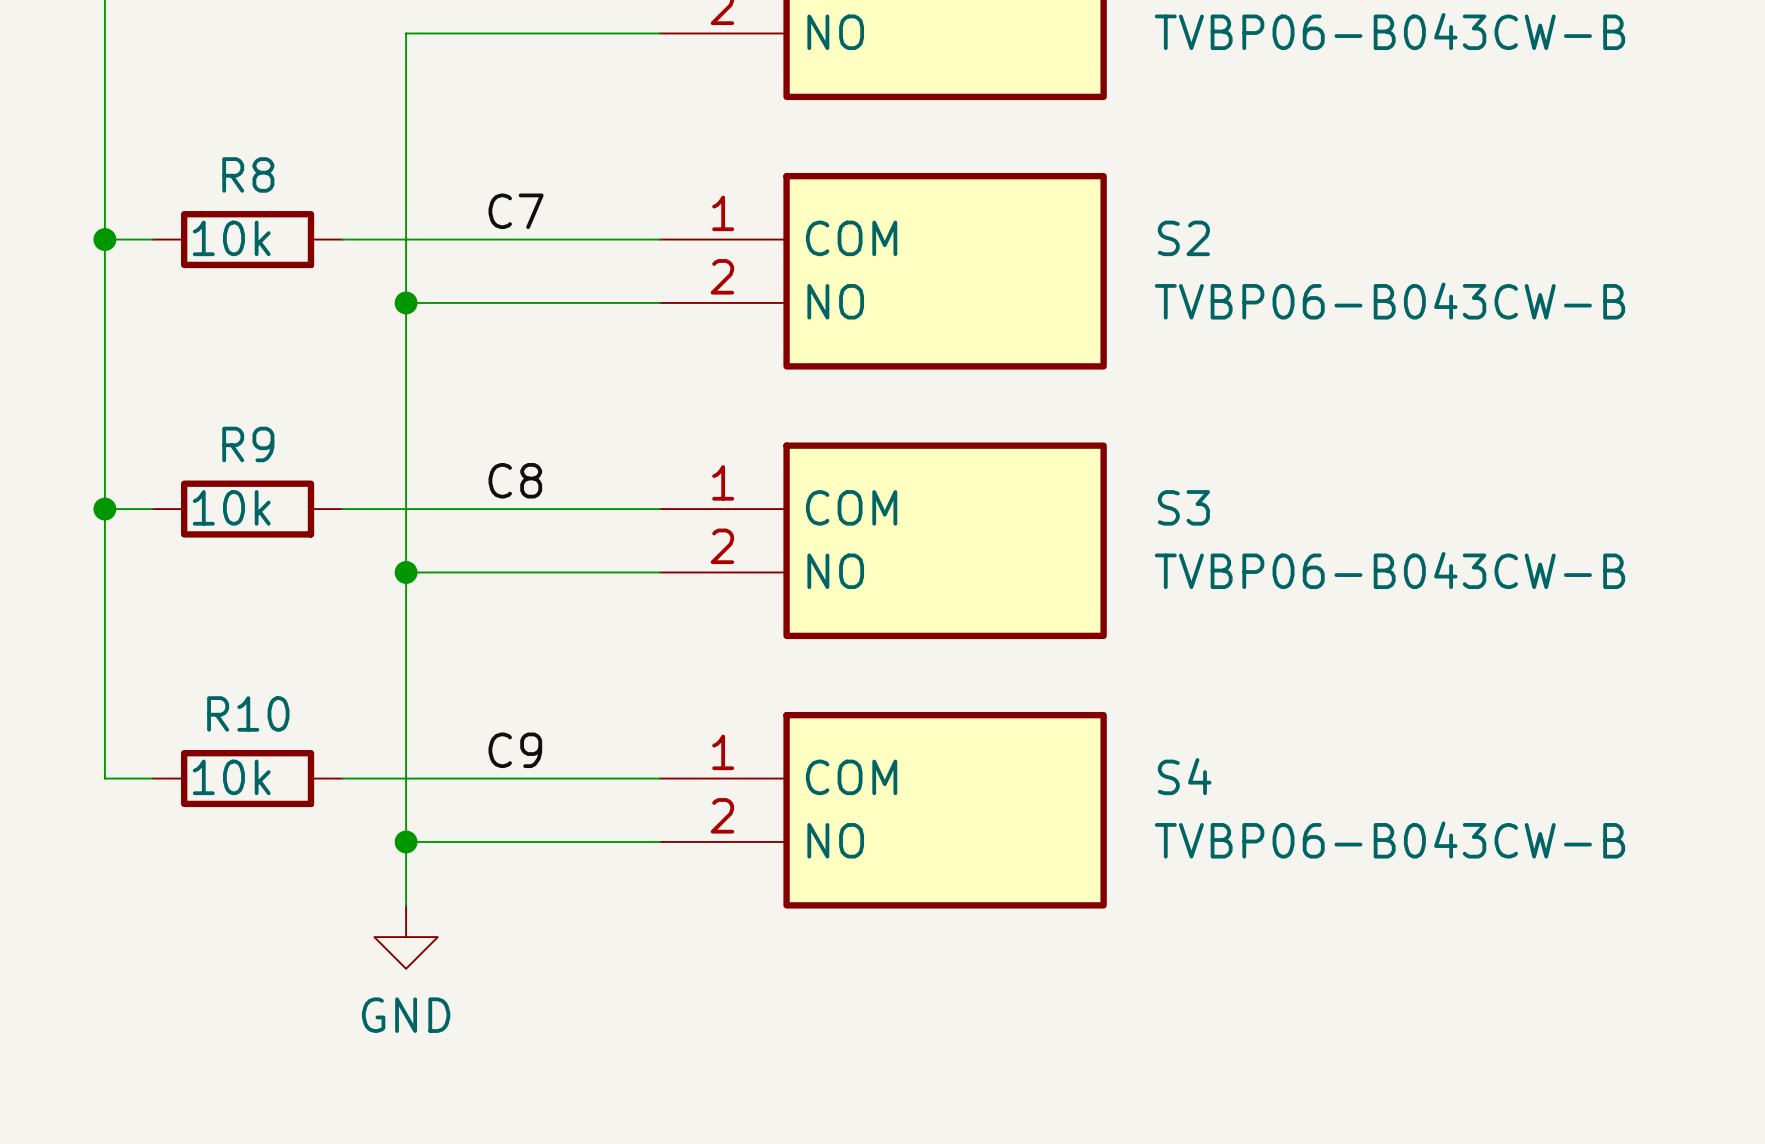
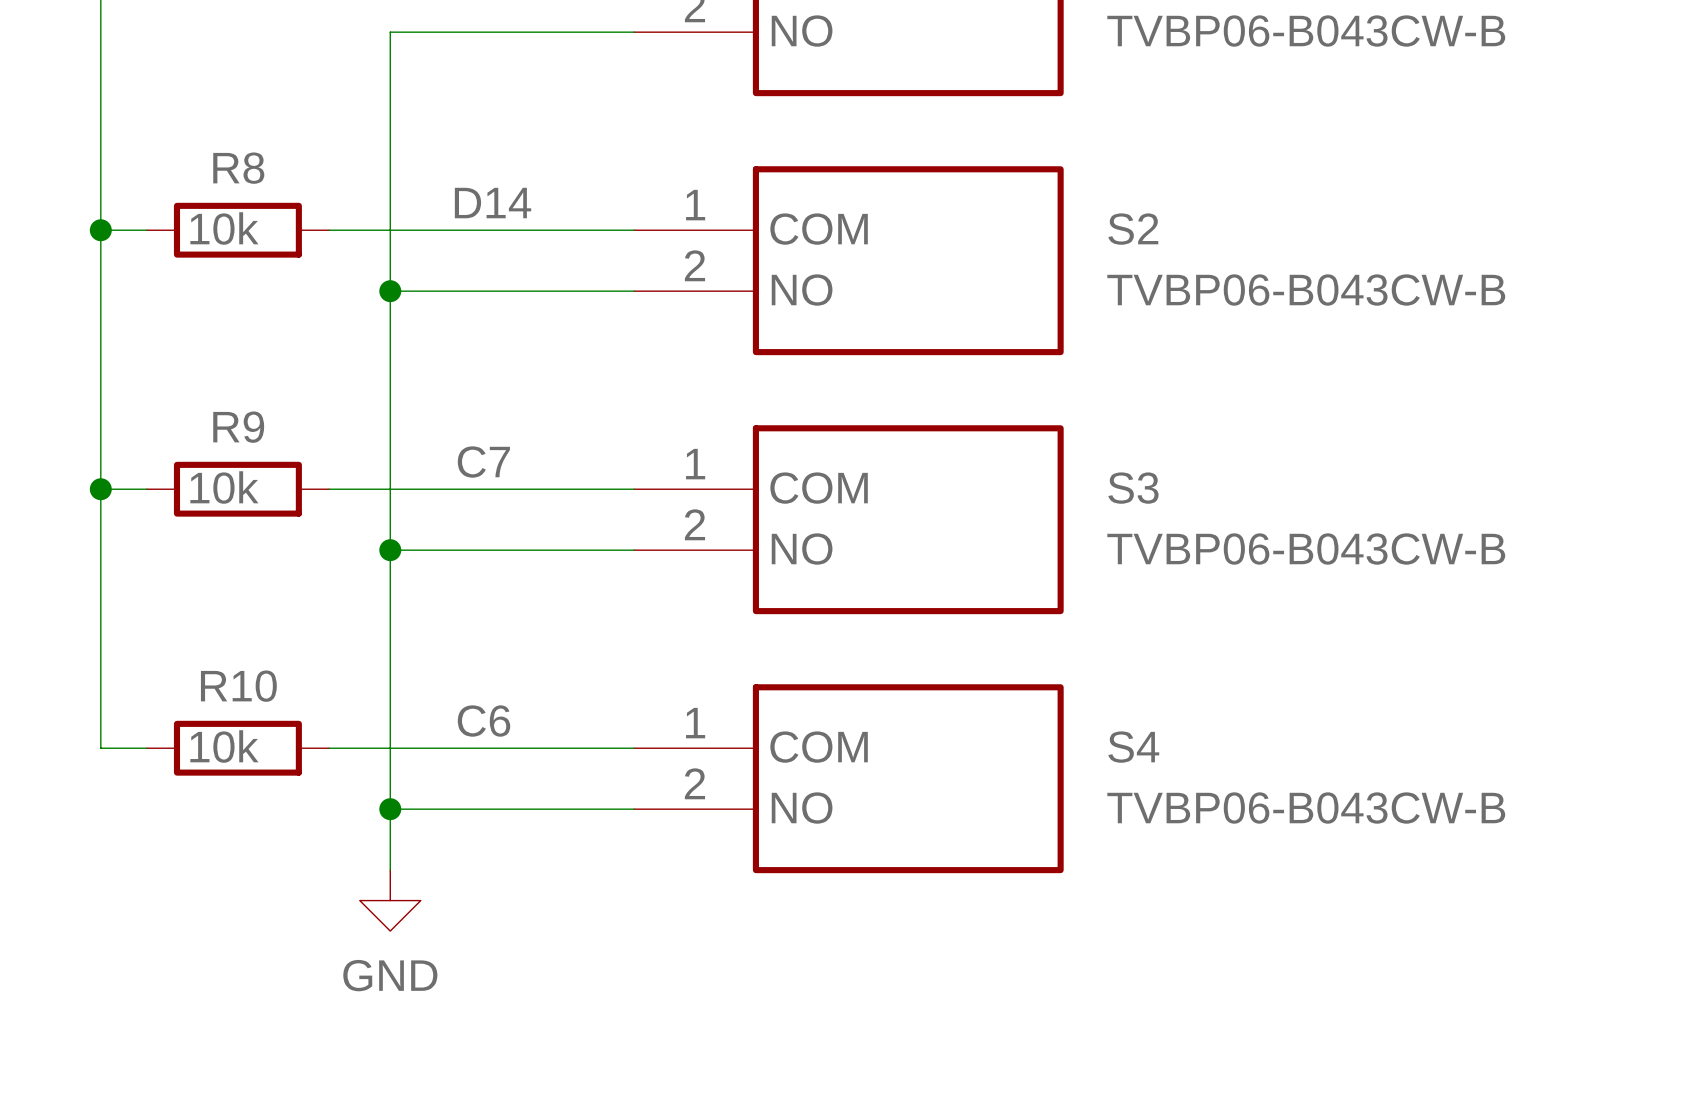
label: none -> D14 (493, 203)
label: C7 (516, 211) -> none
label: C8 (515, 480) -> C7 (483, 462)
label: C9 (515, 750) -> C6 (484, 721)

